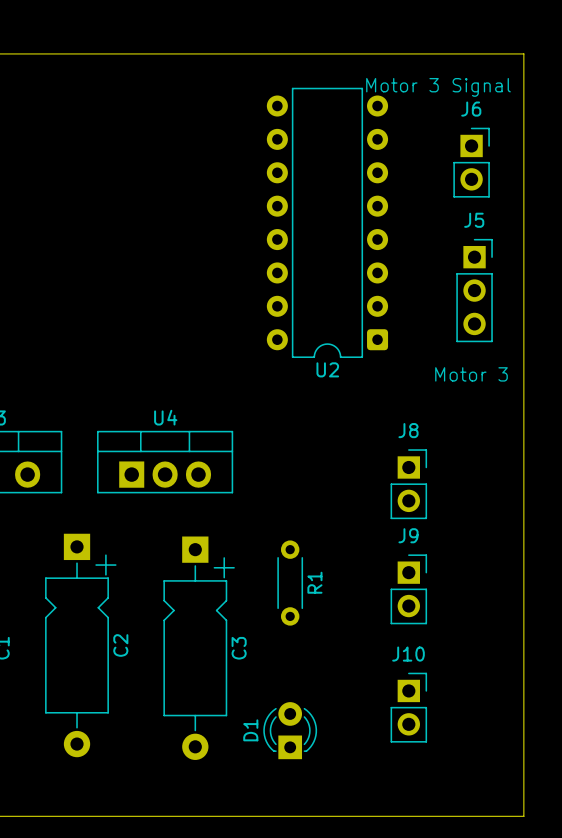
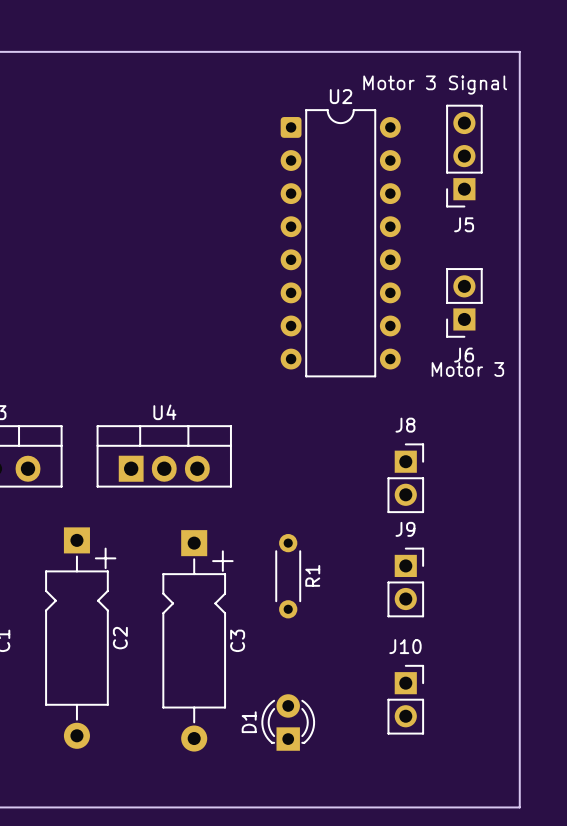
J6 rotation: 0° (471, 162) -> 180° (464, 302)
J6 position: (471, 162) -> (464, 302)
U2 rotation: 0° (327, 222) -> 180° (340, 243)
J5 rotation: 0° (474, 290) -> 180° (464, 156)
J5 position: (474, 290) -> (464, 156)

